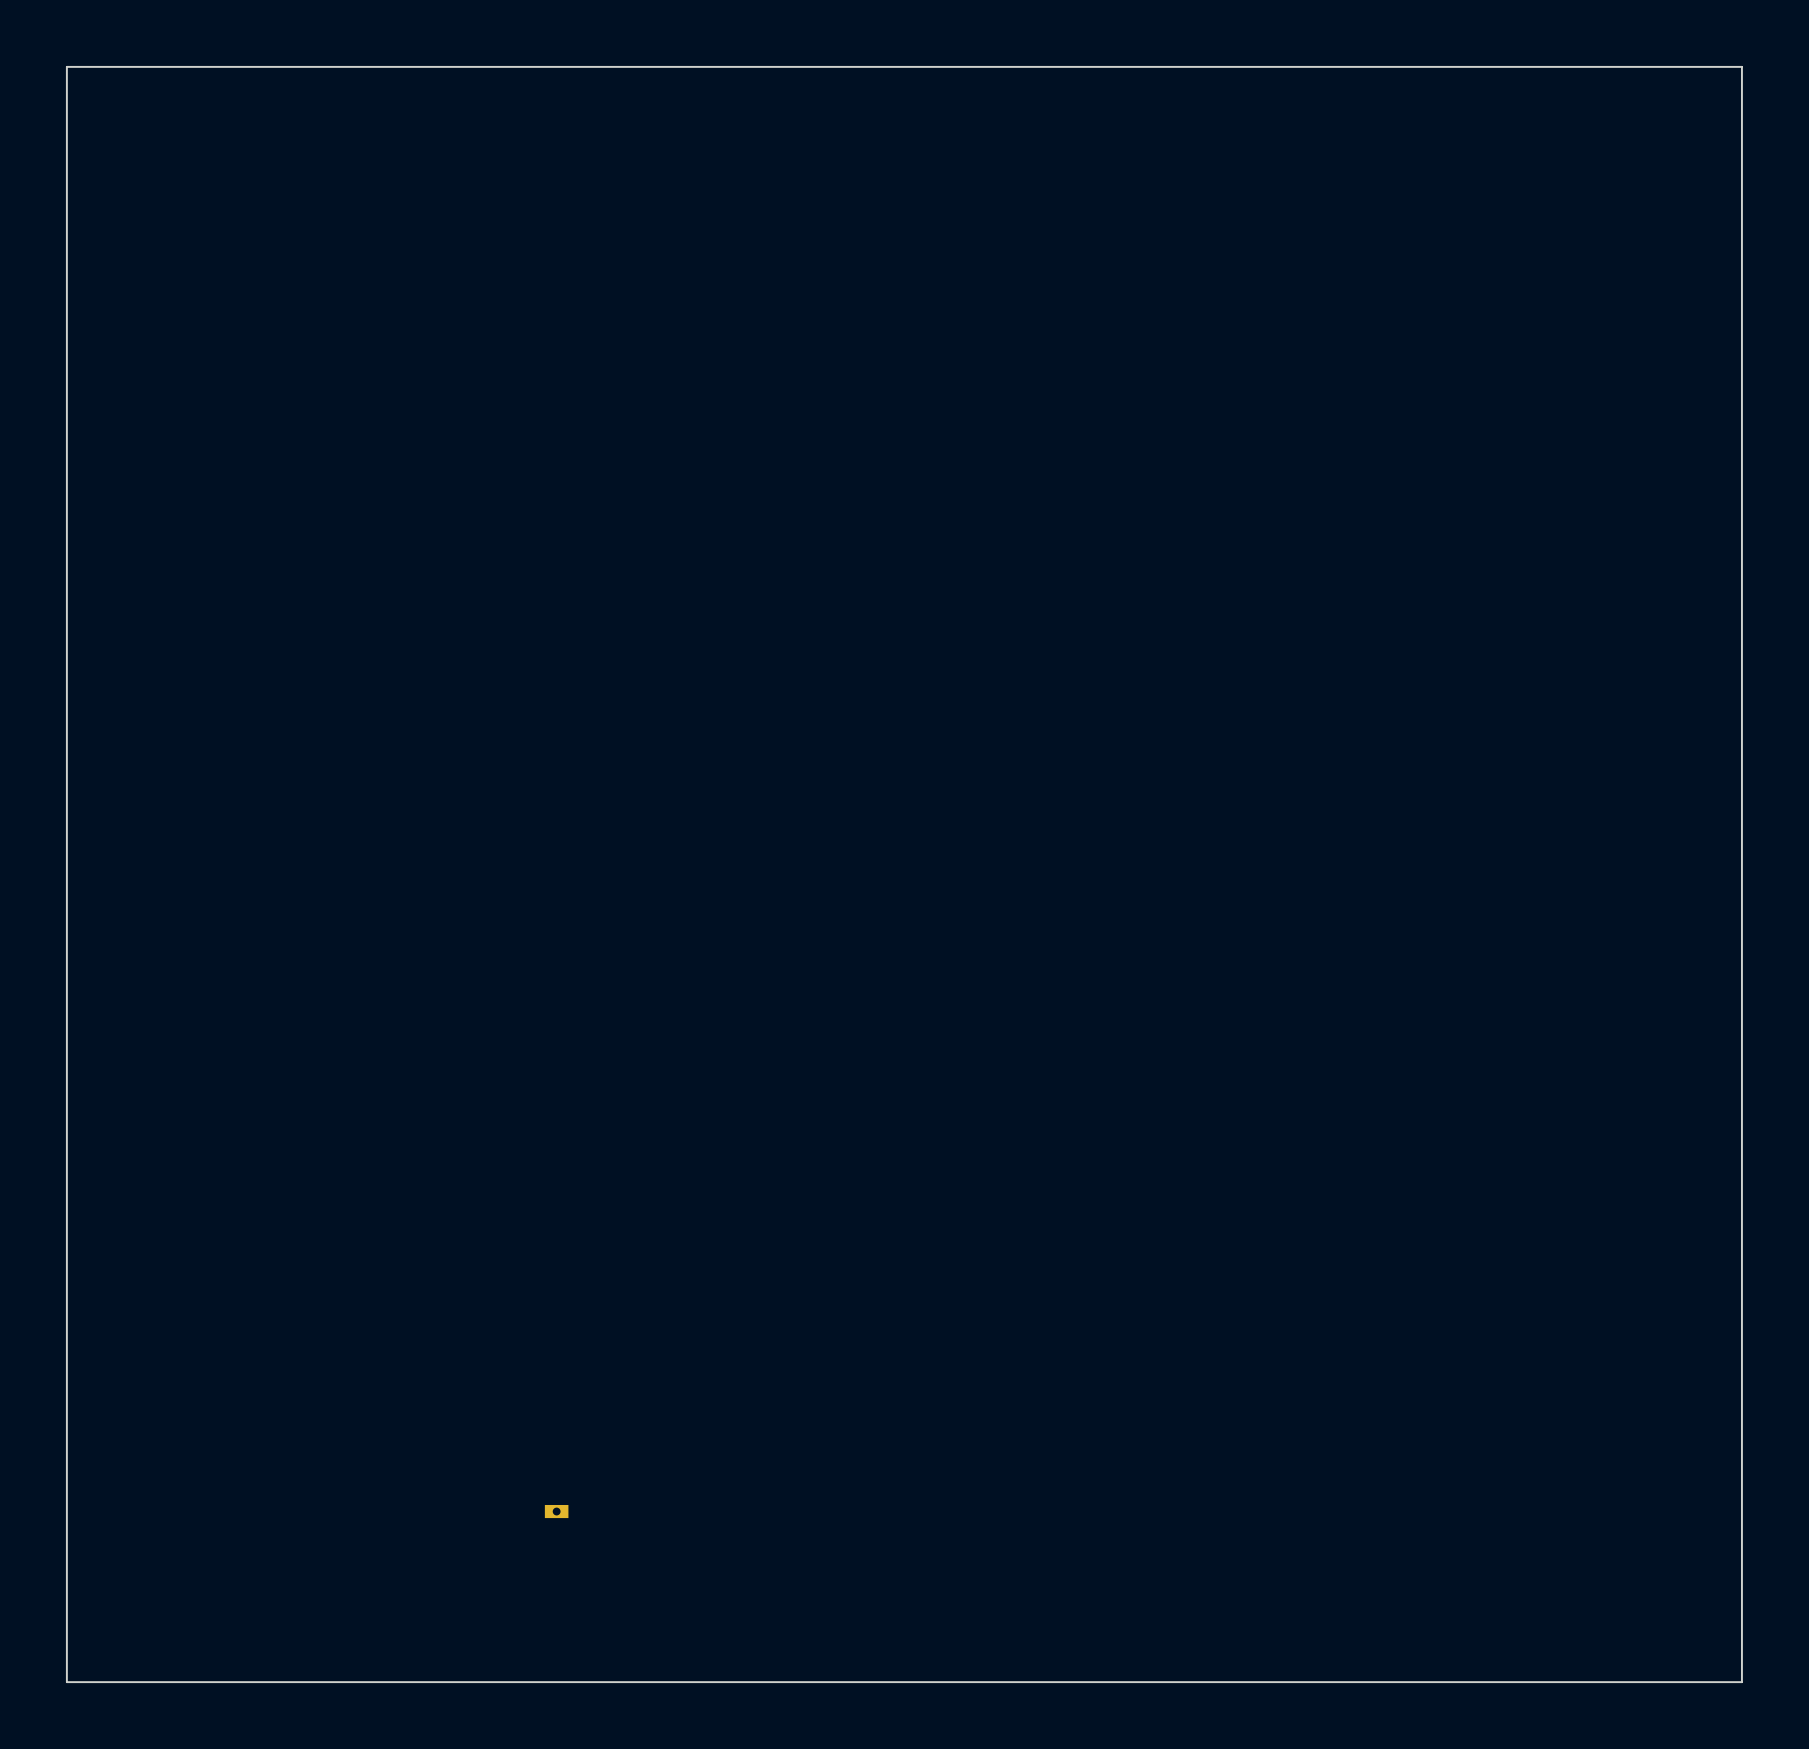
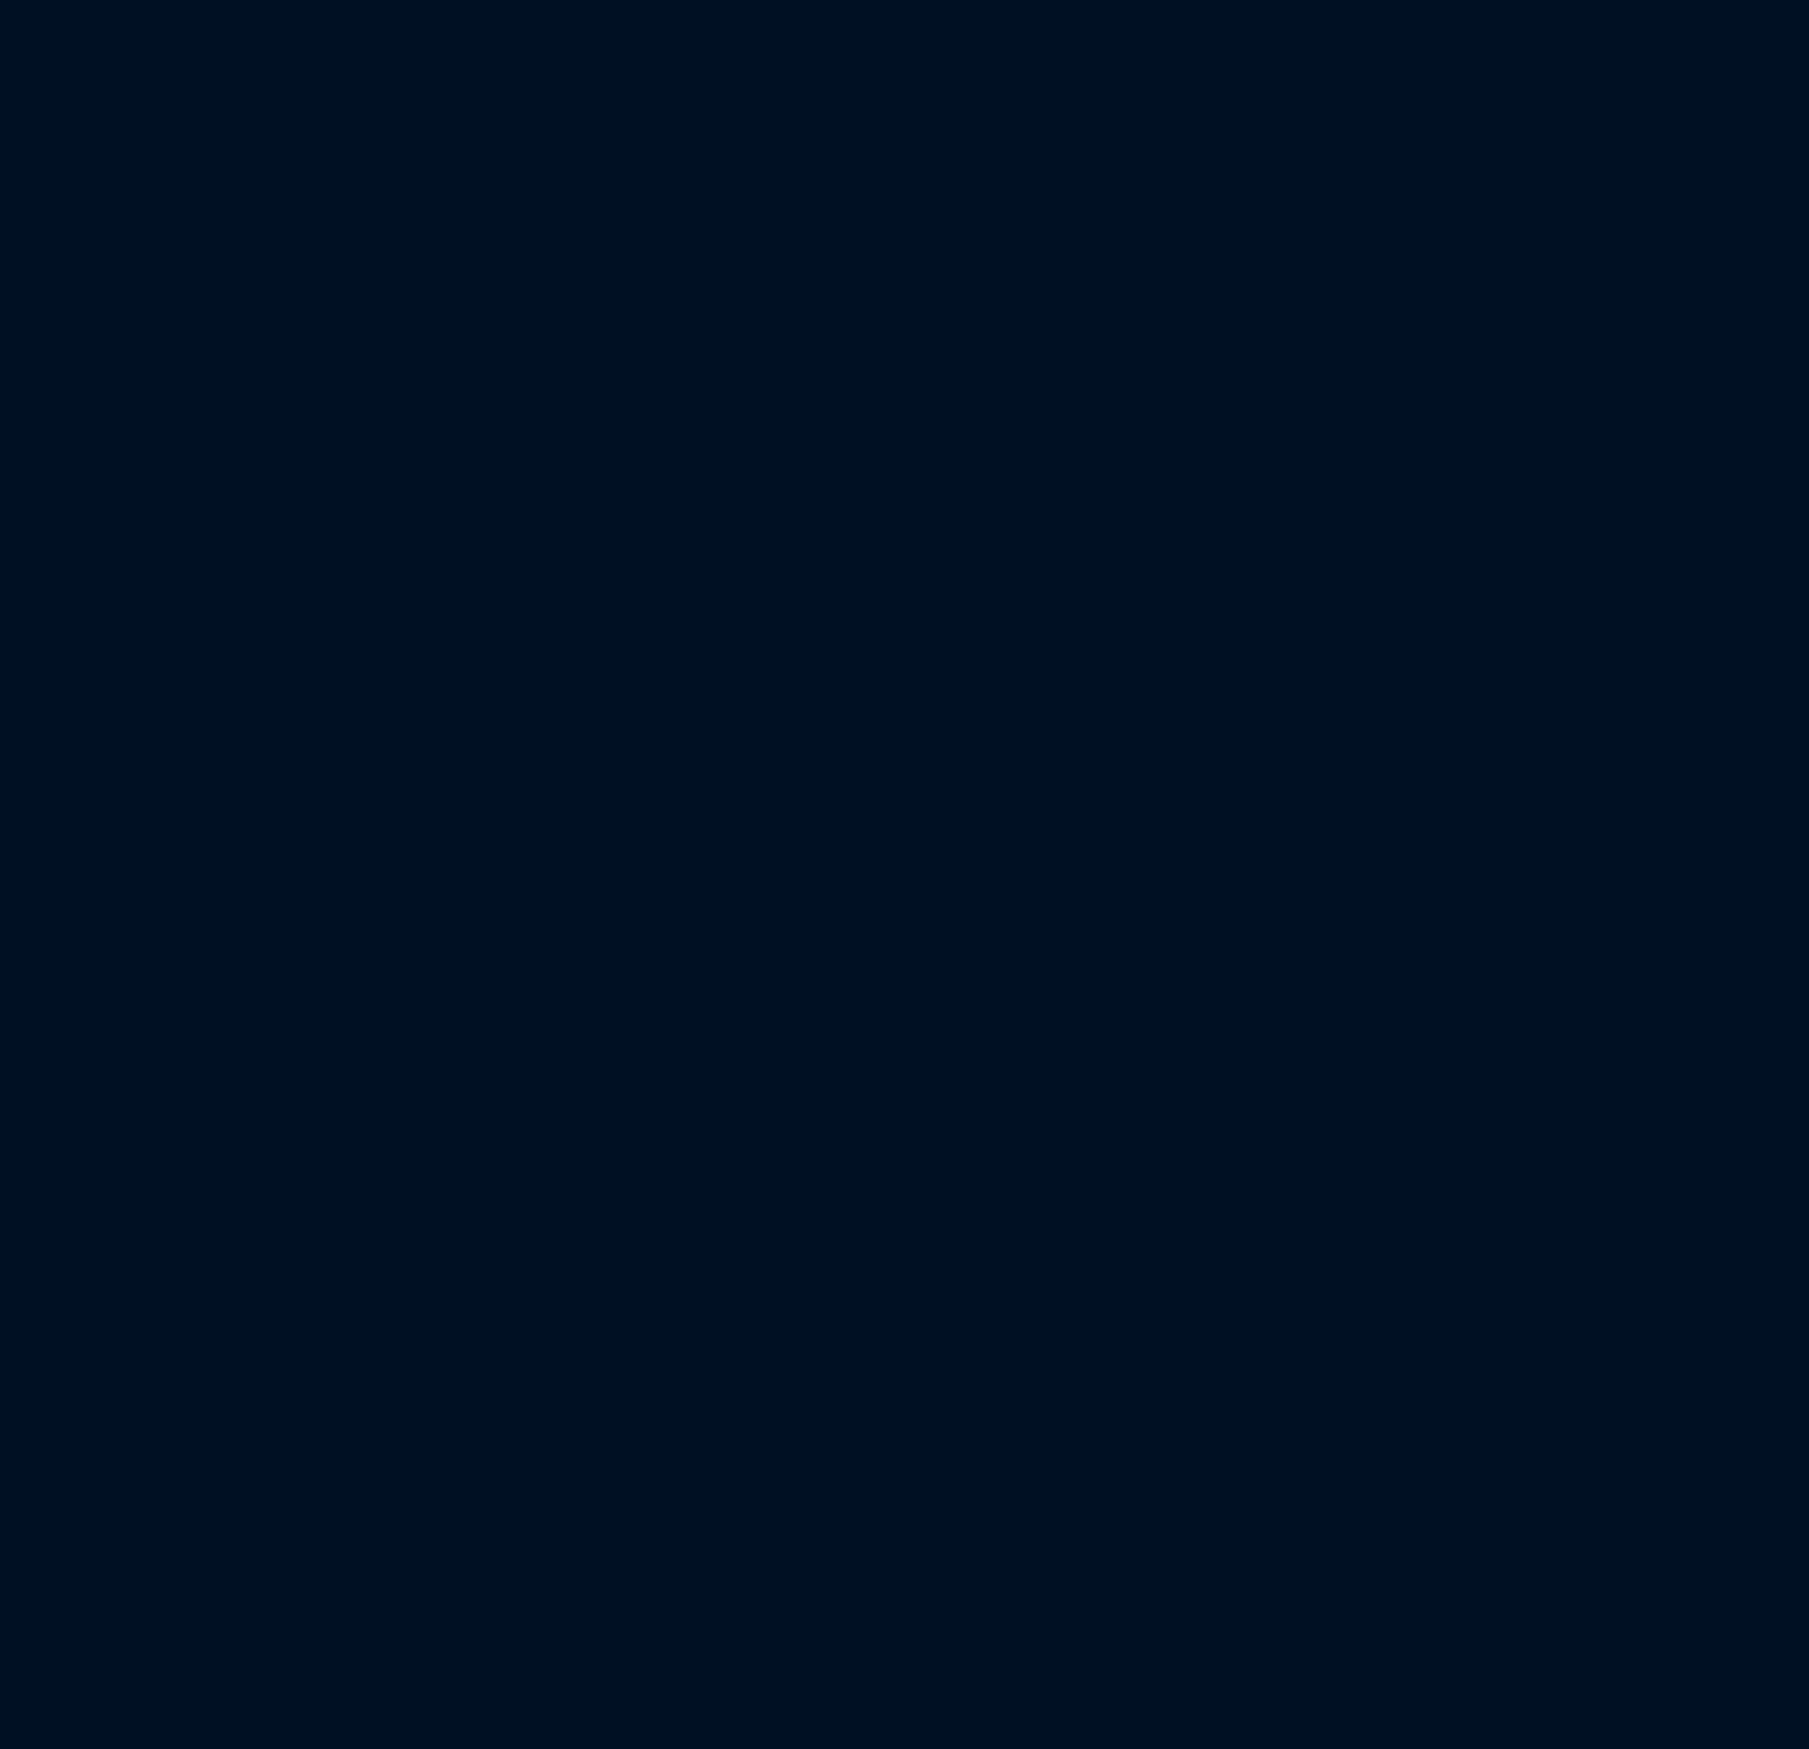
board edge: (1741, 66) (66, 66) (66, 1682) (1741, 1682) (1741, 66) -> none
part: (556, 1511) -> none

